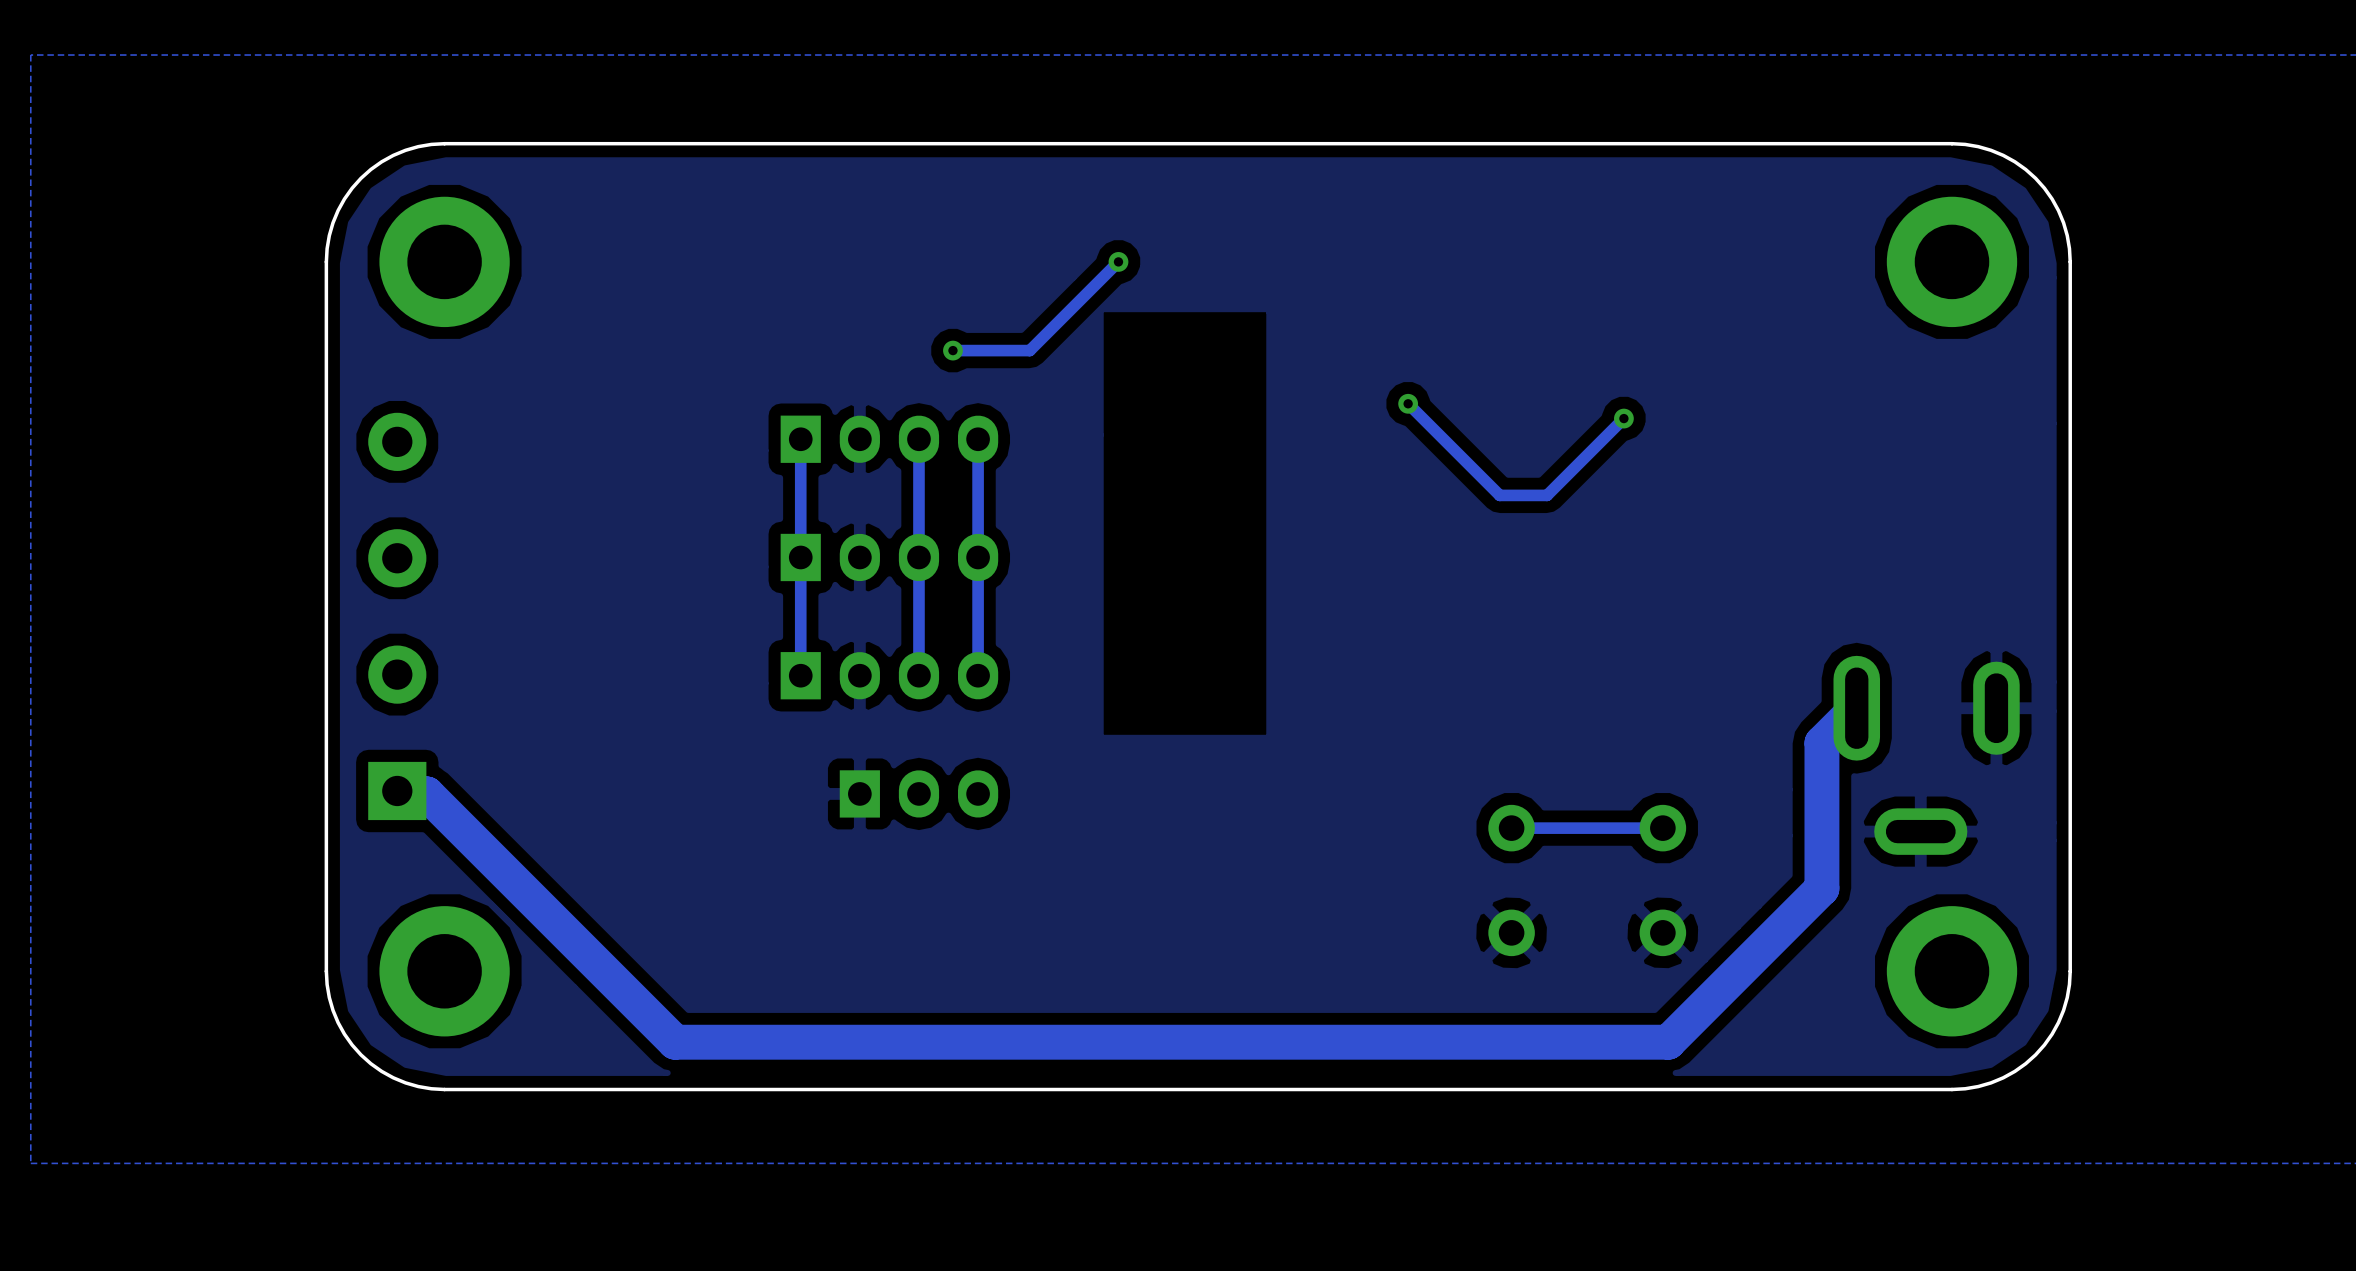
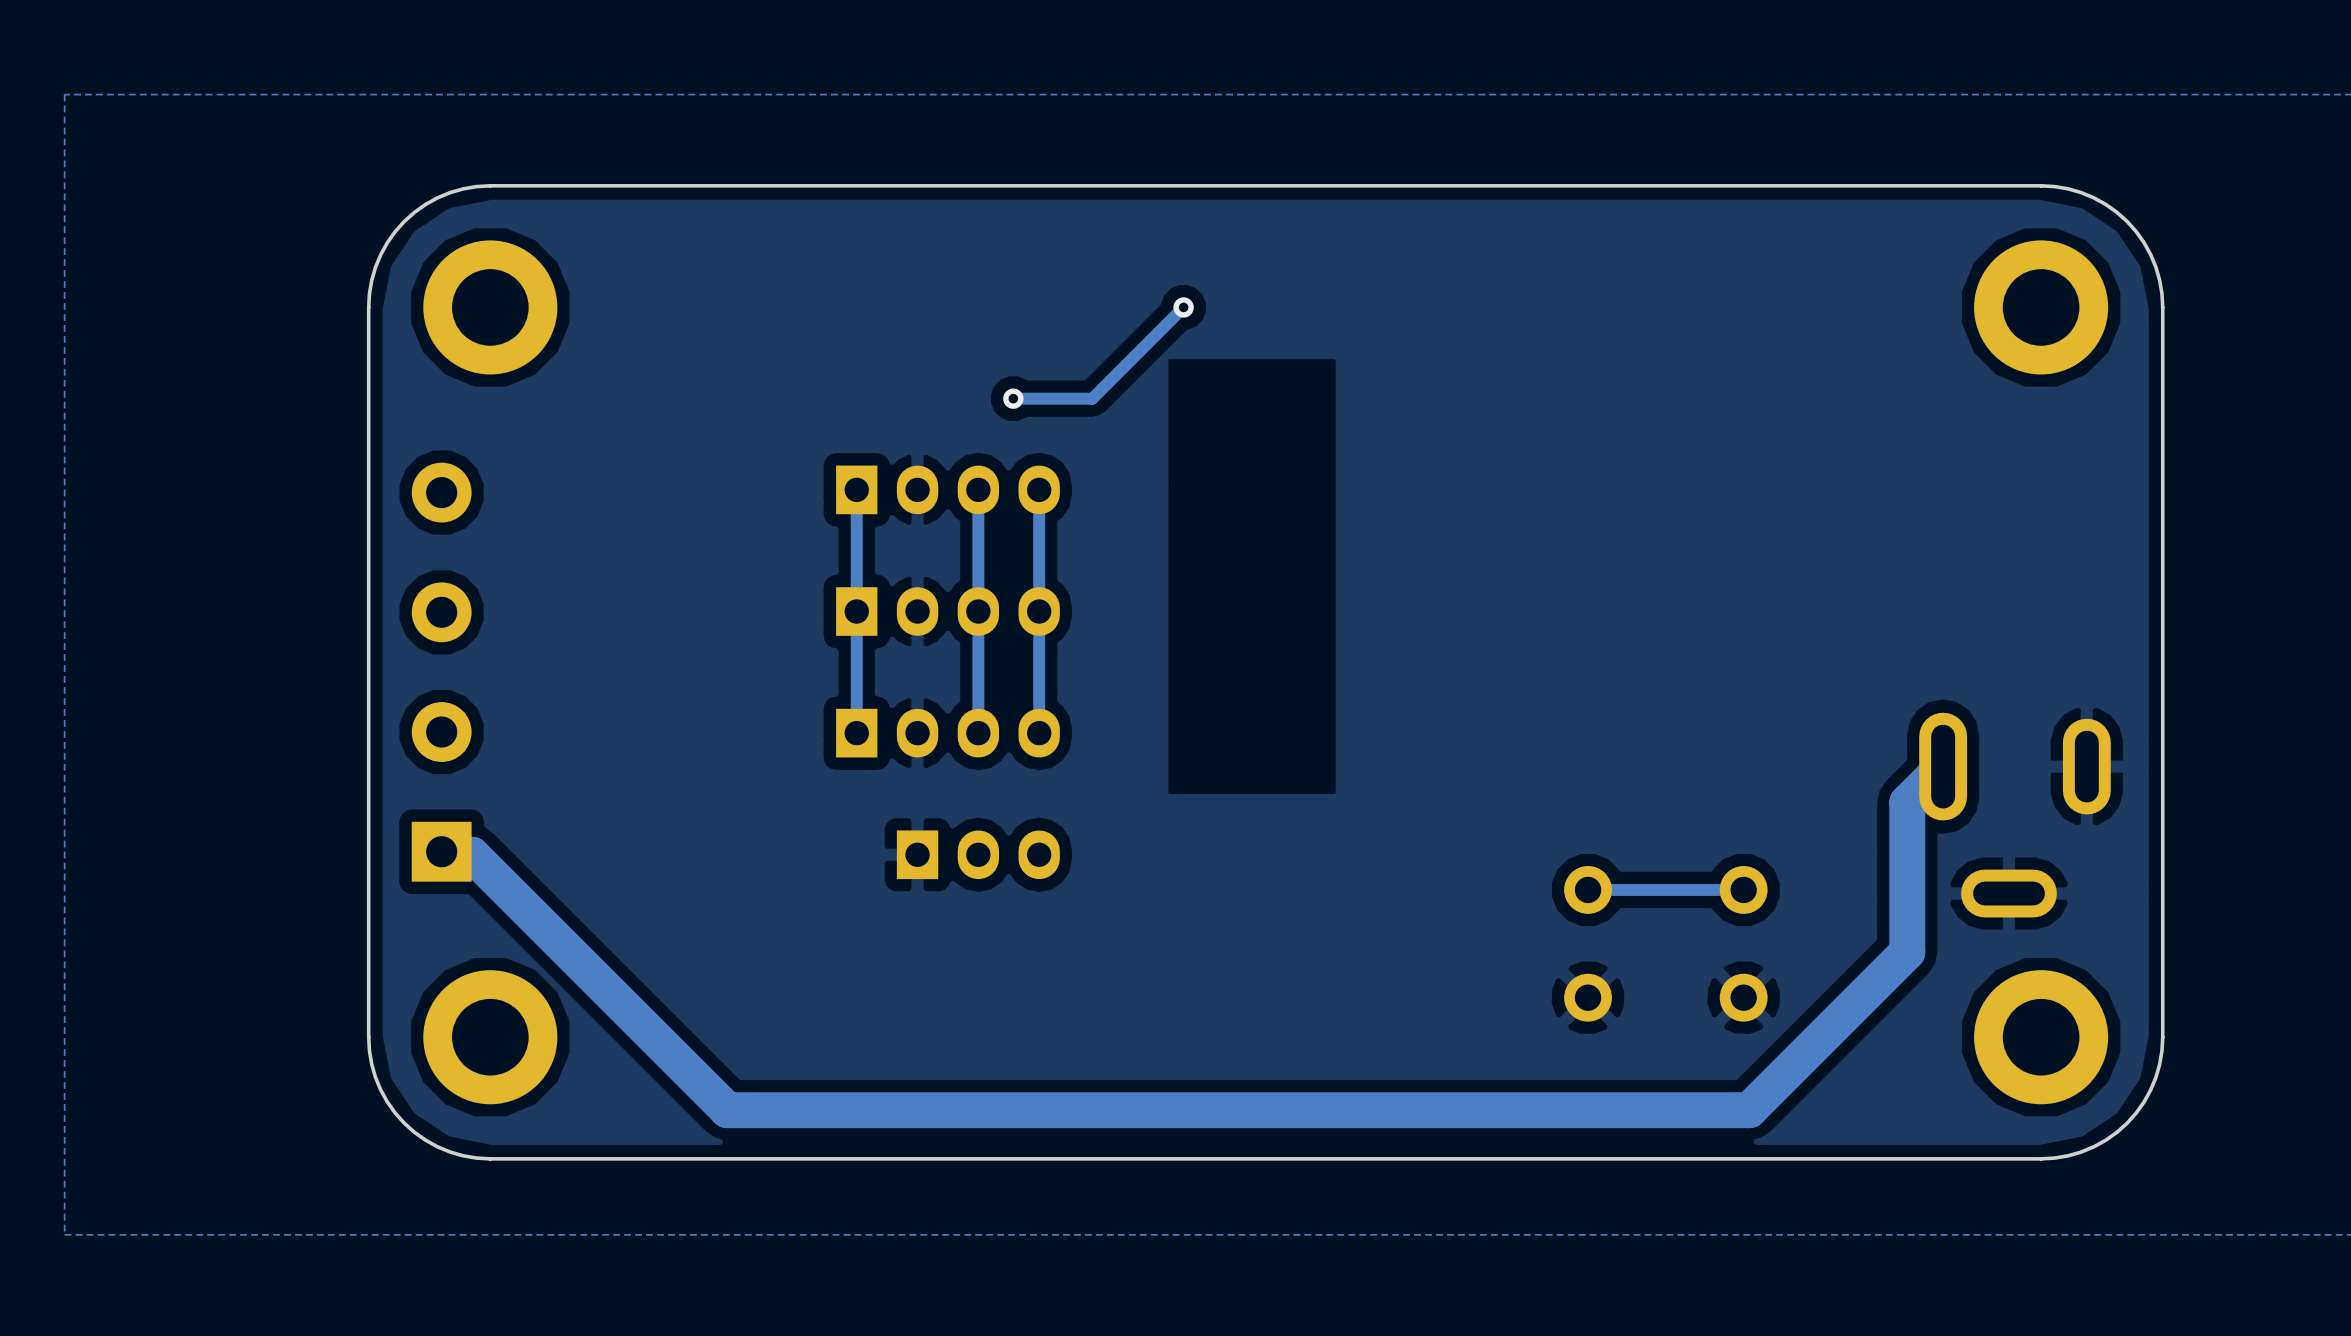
track: (1408, 403) (1499, 495) (1547, 495) (1623, 418) -> none
via: (1408, 403) -> none
via: (1623, 418) -> none

